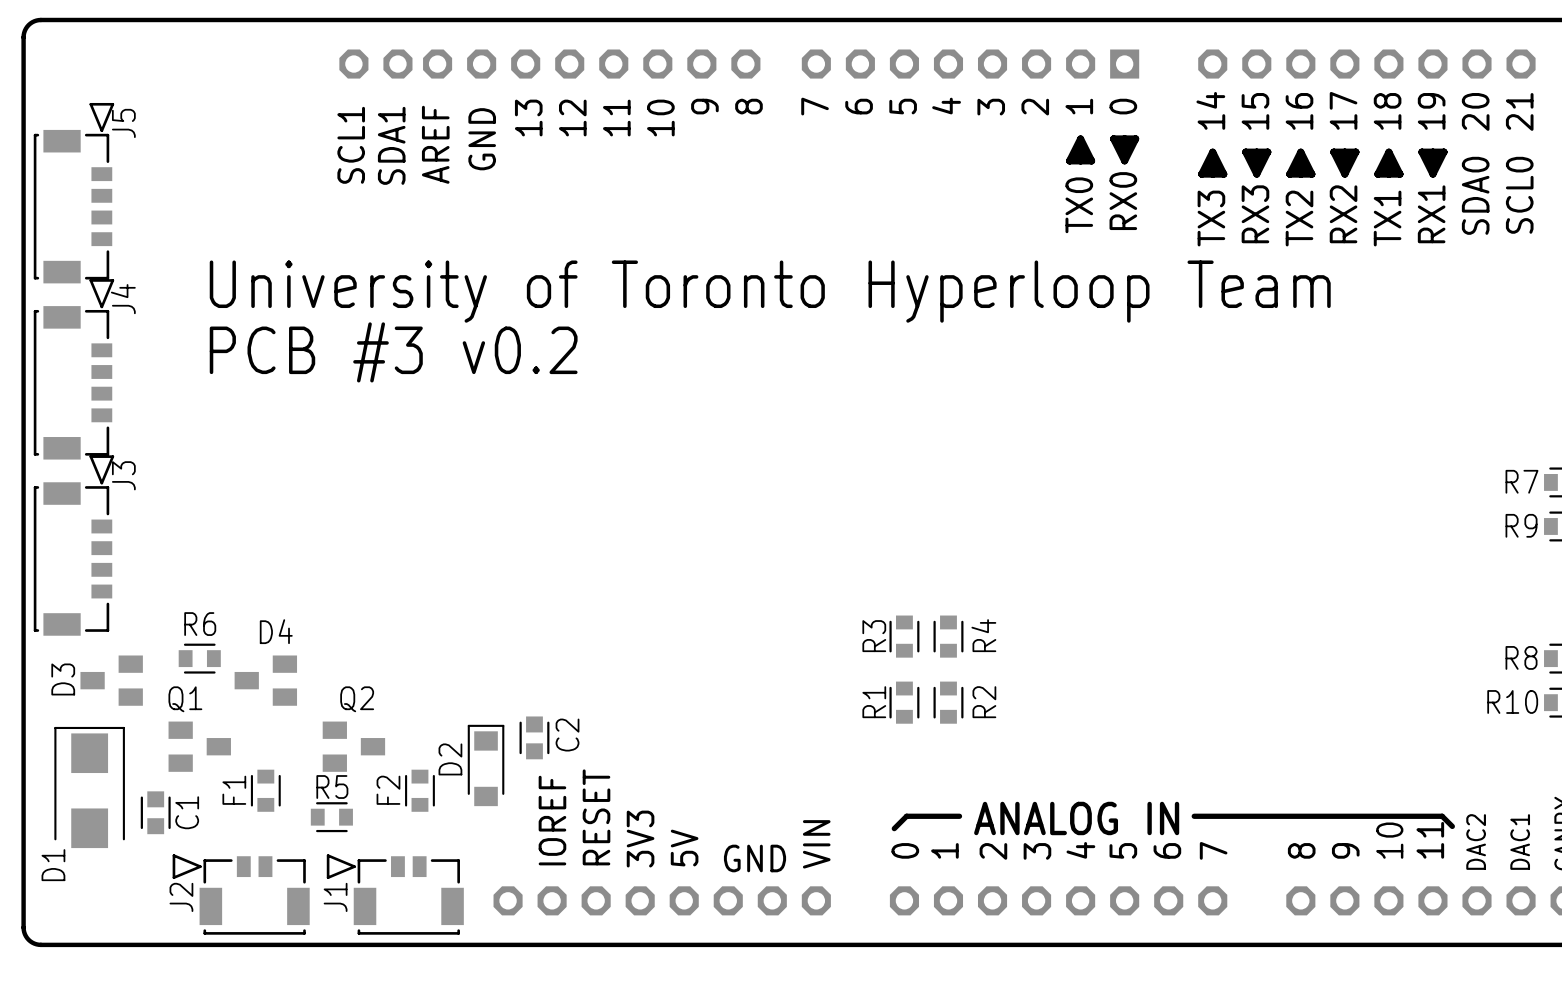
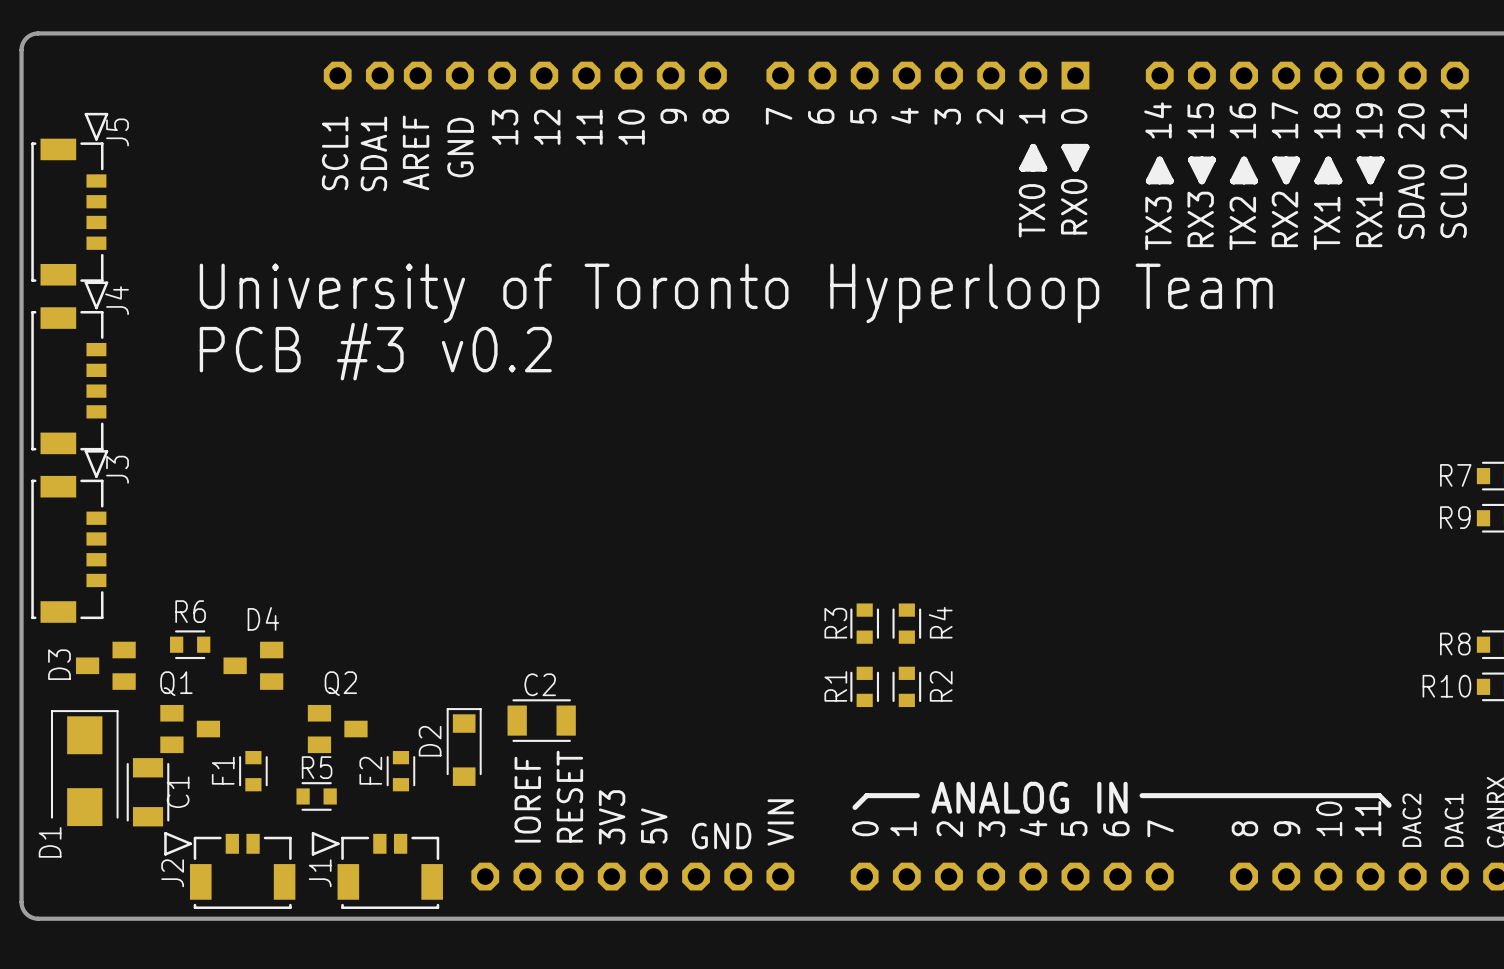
C2 footprint: [519, 716, 550, 760] -> [507, 699, 576, 742]
C2 name position: C2 (567, 735) -> C2 (540, 684)
C1 footprint: [140, 791, 171, 835] -> [126, 758, 170, 827]

